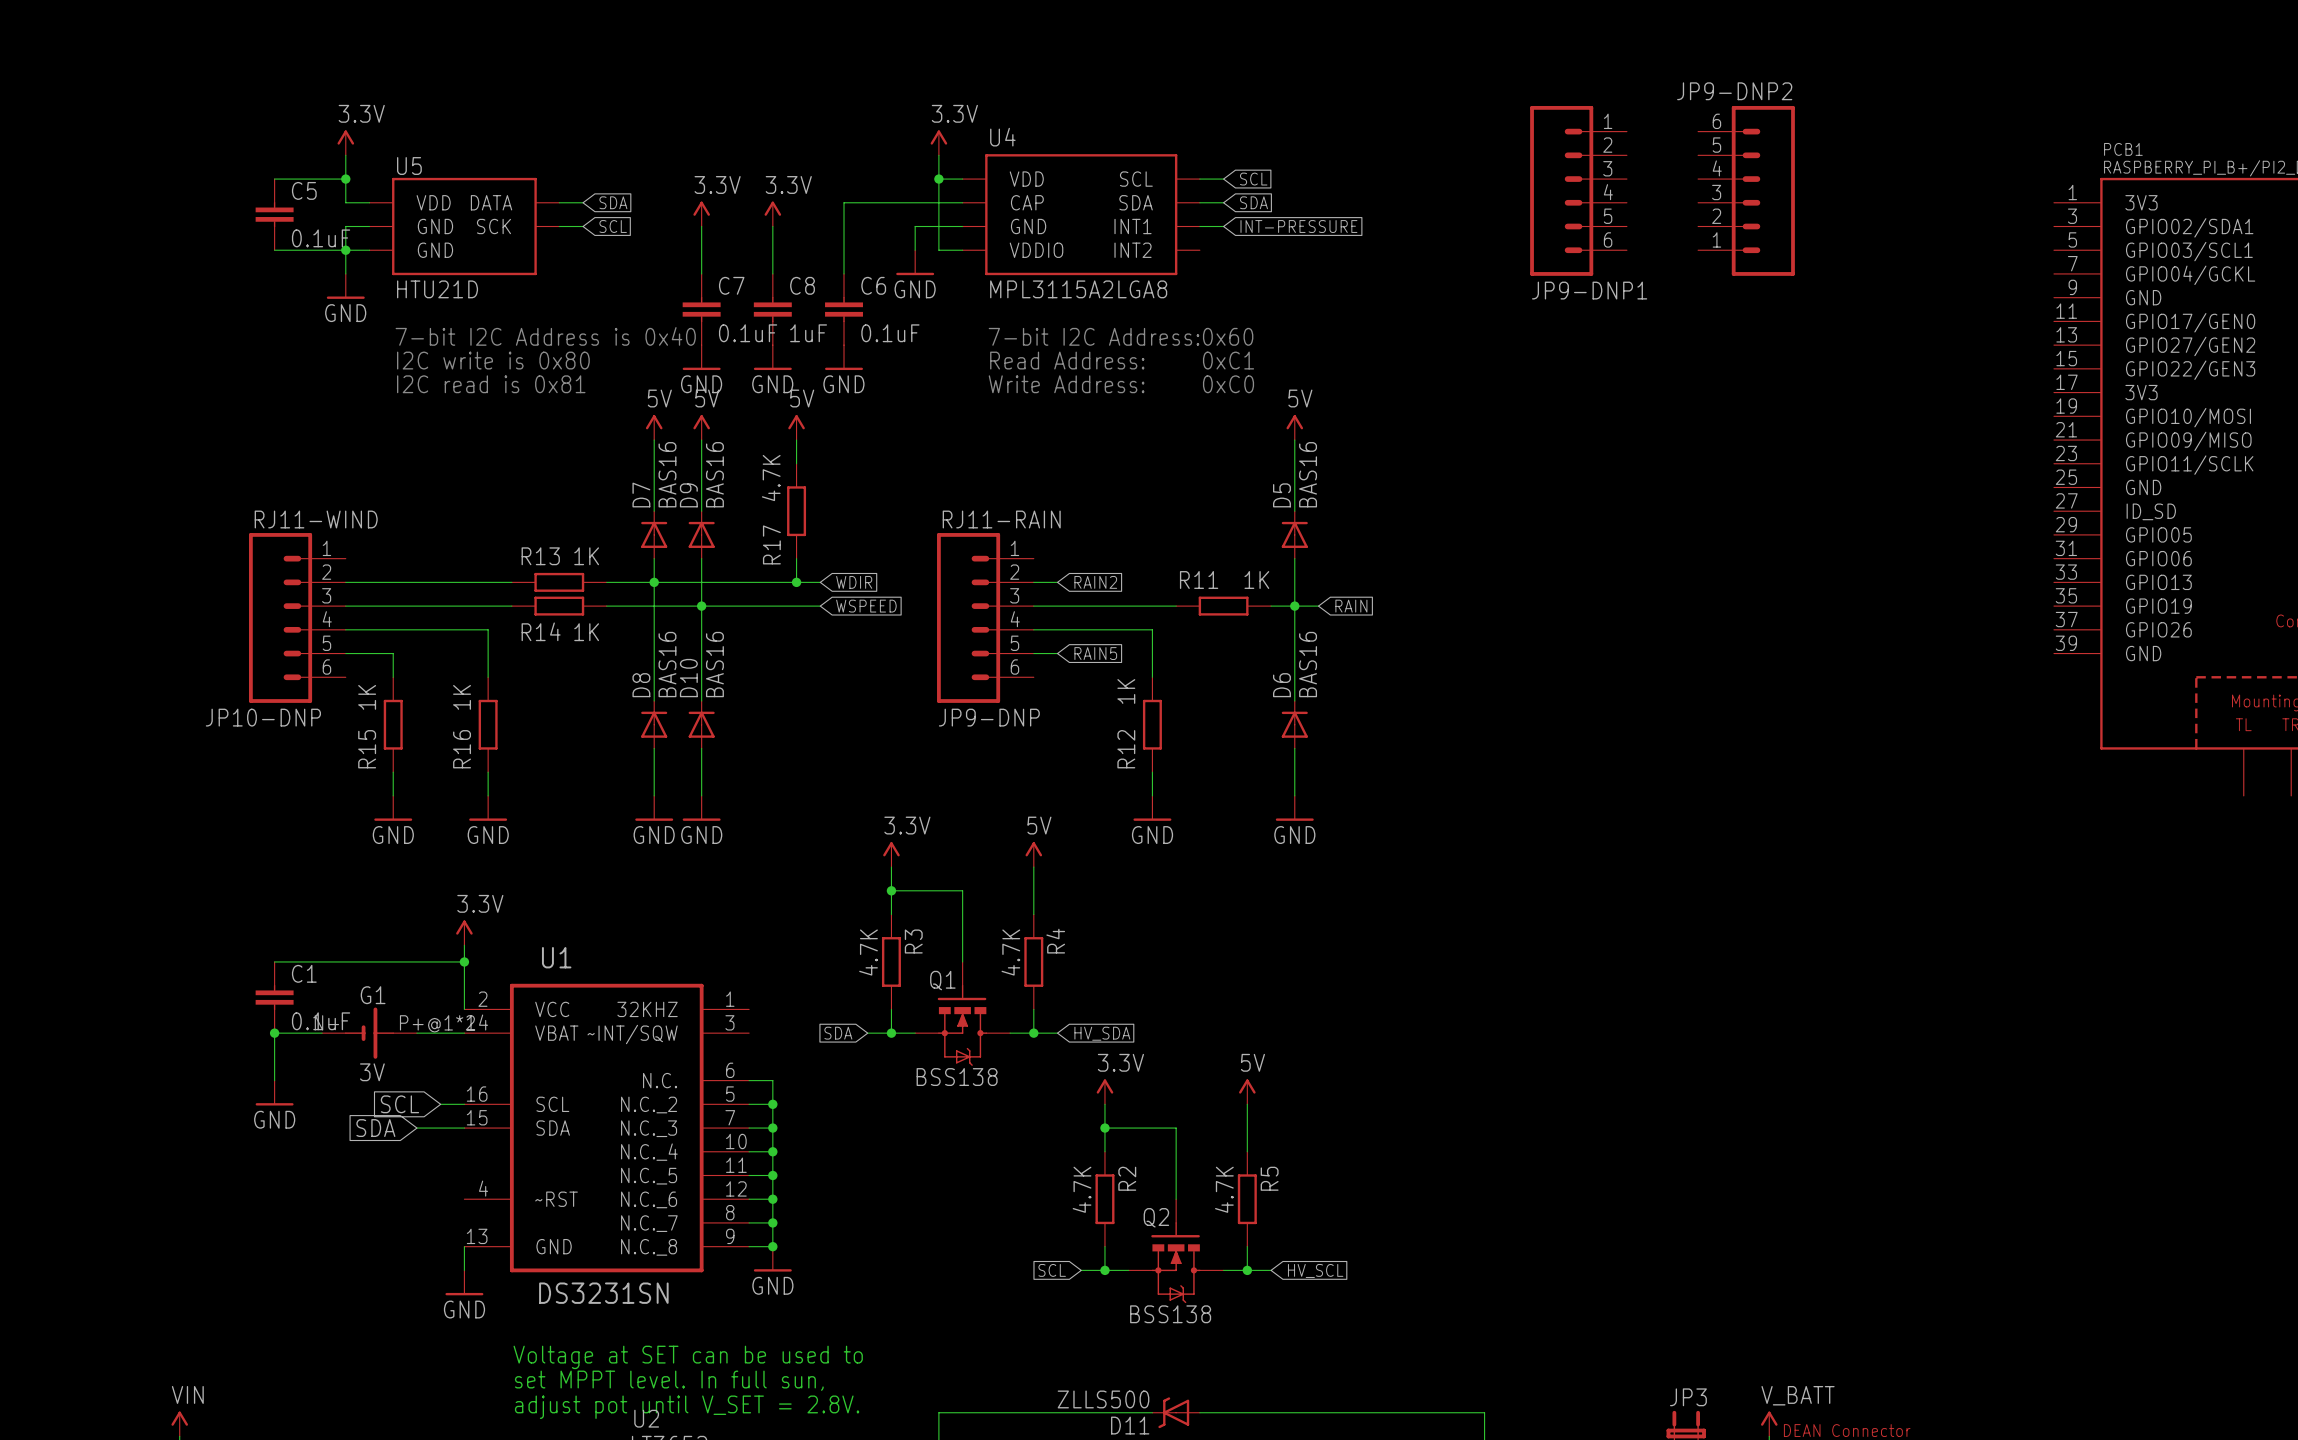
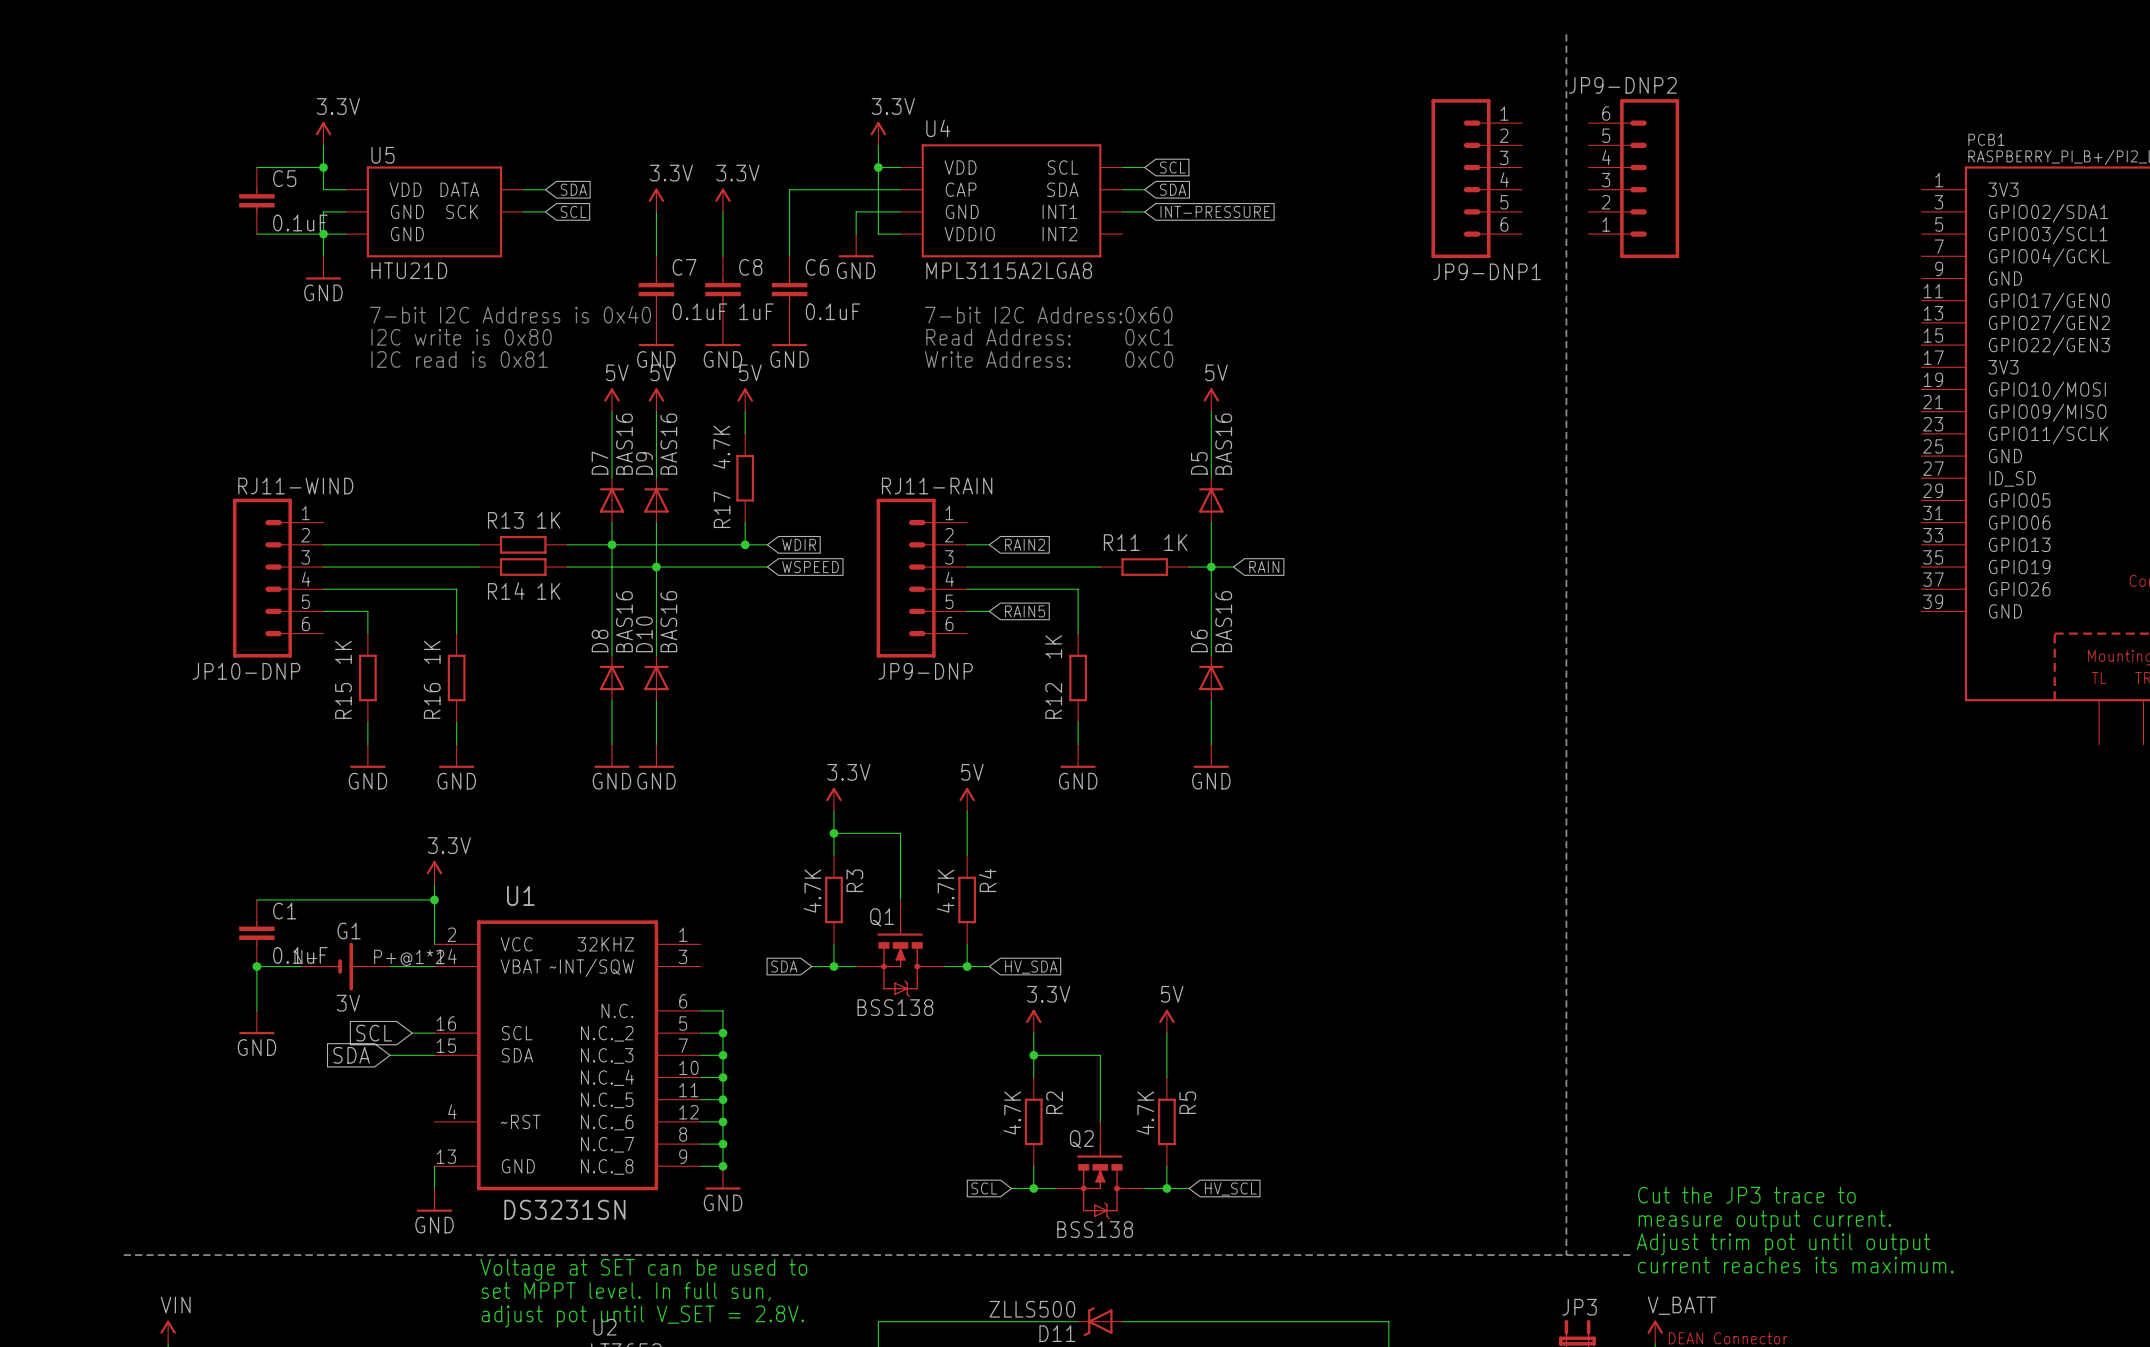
line: none -> (1566, 34) (1566, 1255)
text: none -> Cut the JP3 trace to (1746, 1195)
text: none -> measure output current. (1764, 1221)
text: none -> Adjust trim pot until output (1783, 1244)
line: none -> (123, 1255) (1633, 1255)
text: none -> current reaches its maximum. (1795, 1265)

